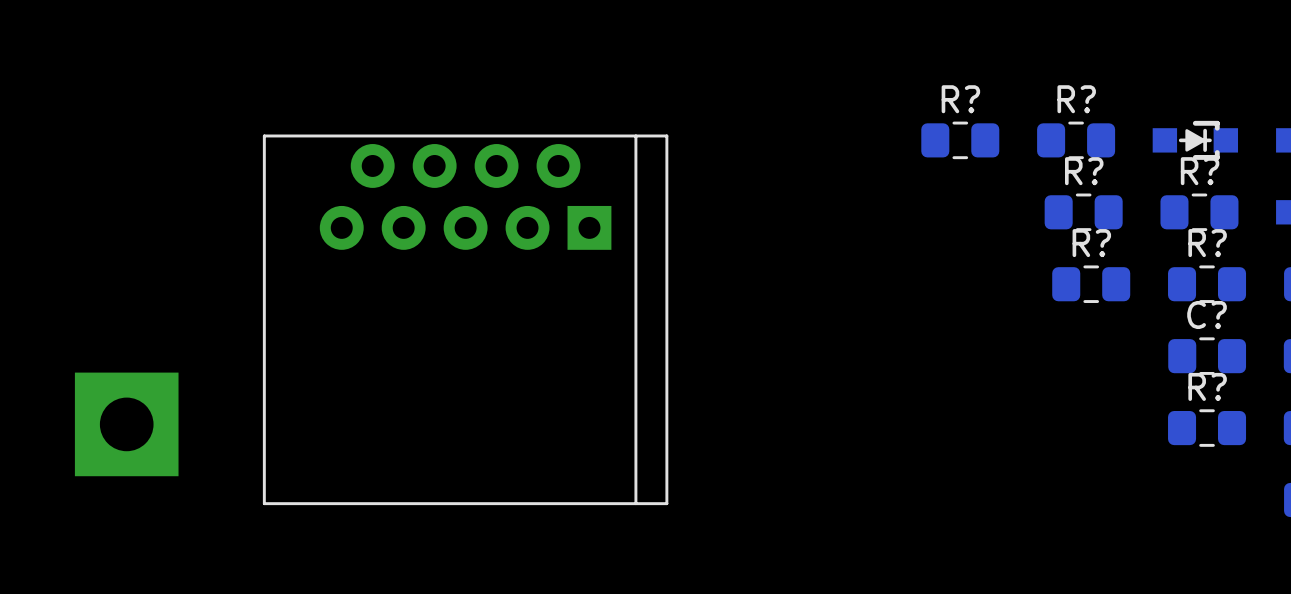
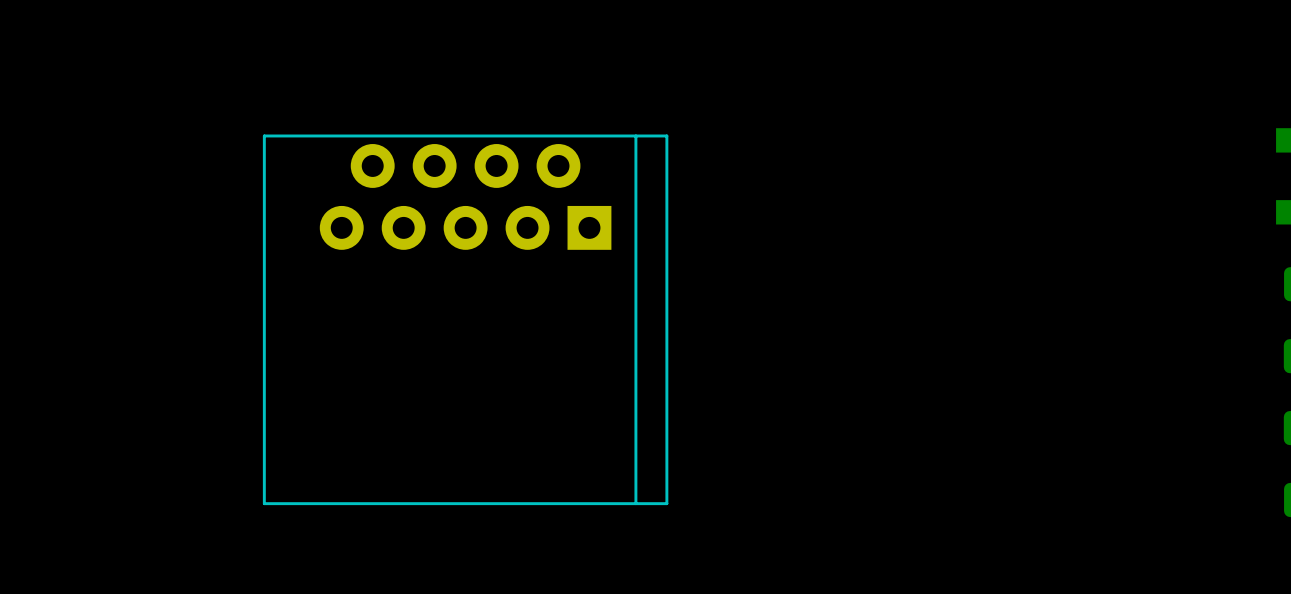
part: (960, 140) -> none
part: (1076, 140) -> none
part: (1195, 140) -> none
part: (1083, 212) -> none
part: (1199, 212) -> none
part: (1091, 284) -> none
part: (1207, 284) -> none
part: (1207, 356) -> none
part: (126, 424) -> none
part: (1207, 428) -> none

